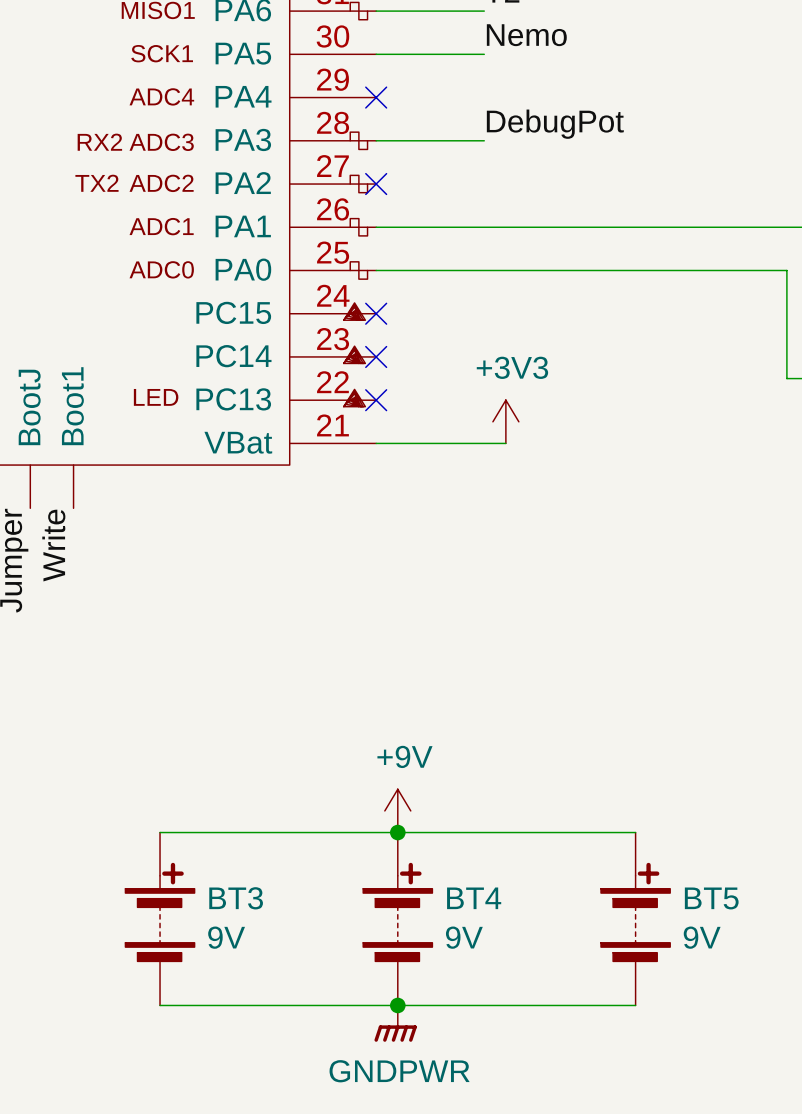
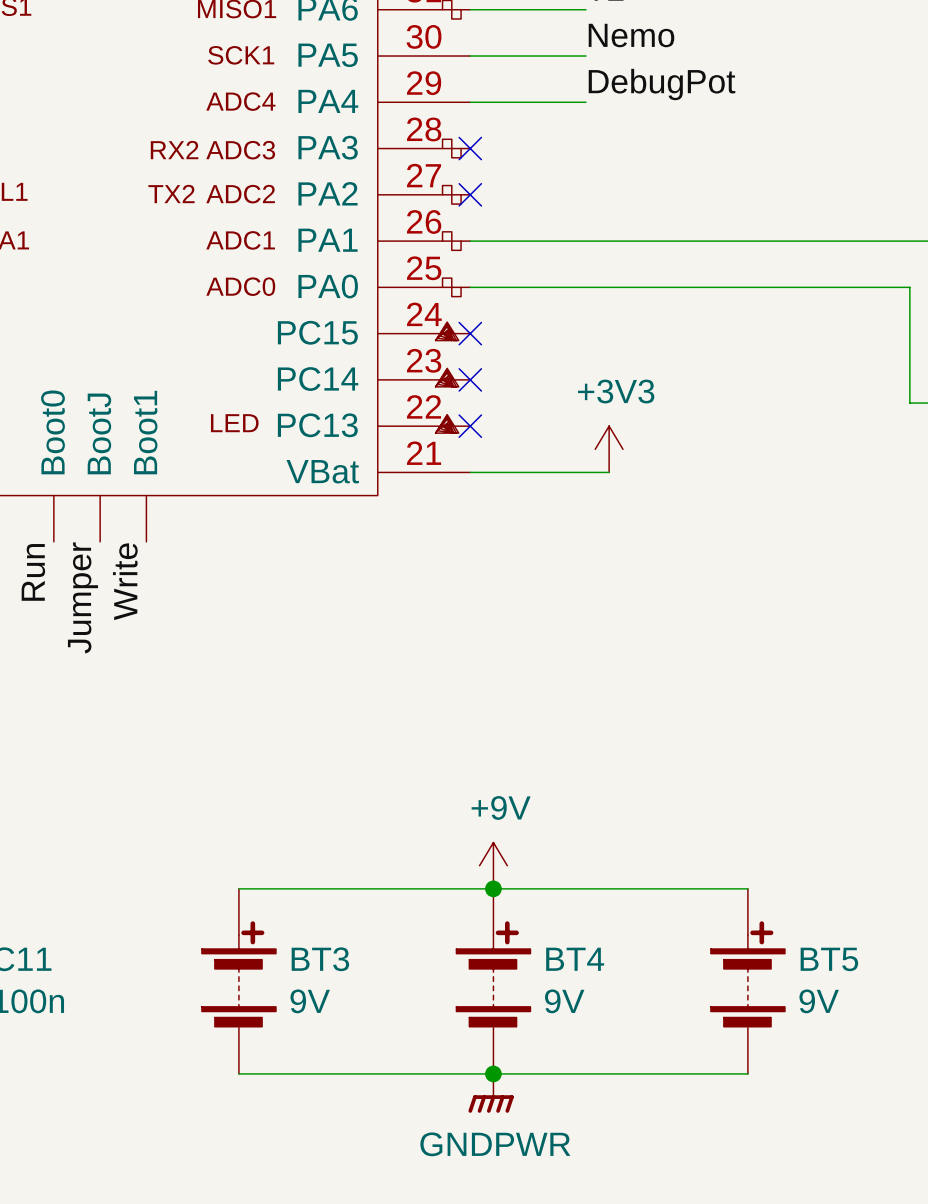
no-connect mark position: (376, 97) -> (470, 148)
label position: DebugPot (555, 124) -> DebugPot (662, 84)
wire: (376, 140) (484, 140) -> (470, 102) (585, 102)

